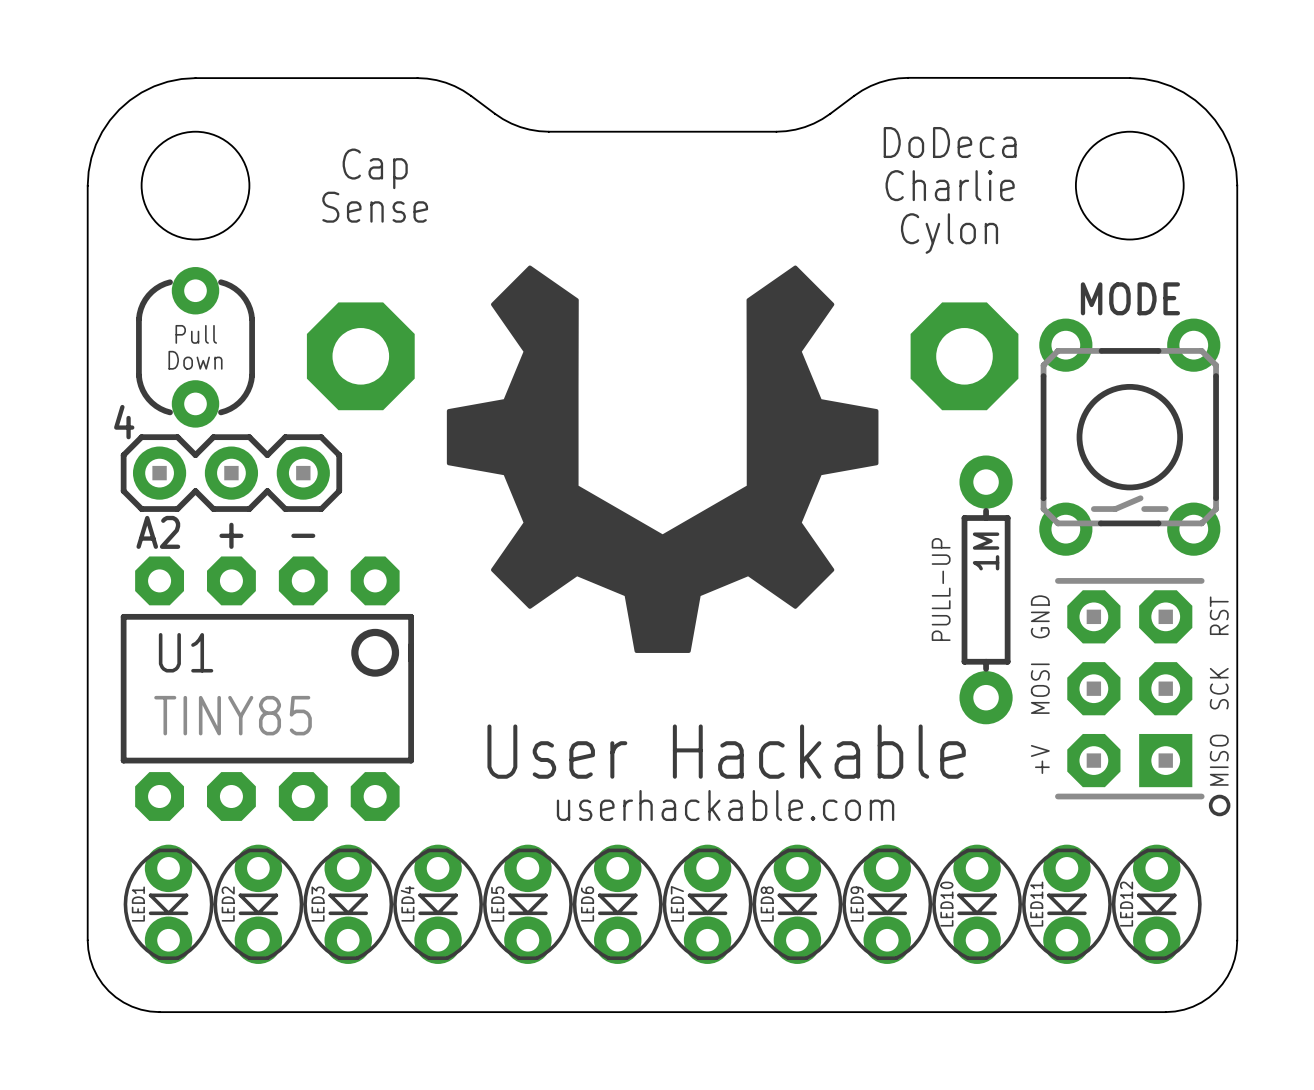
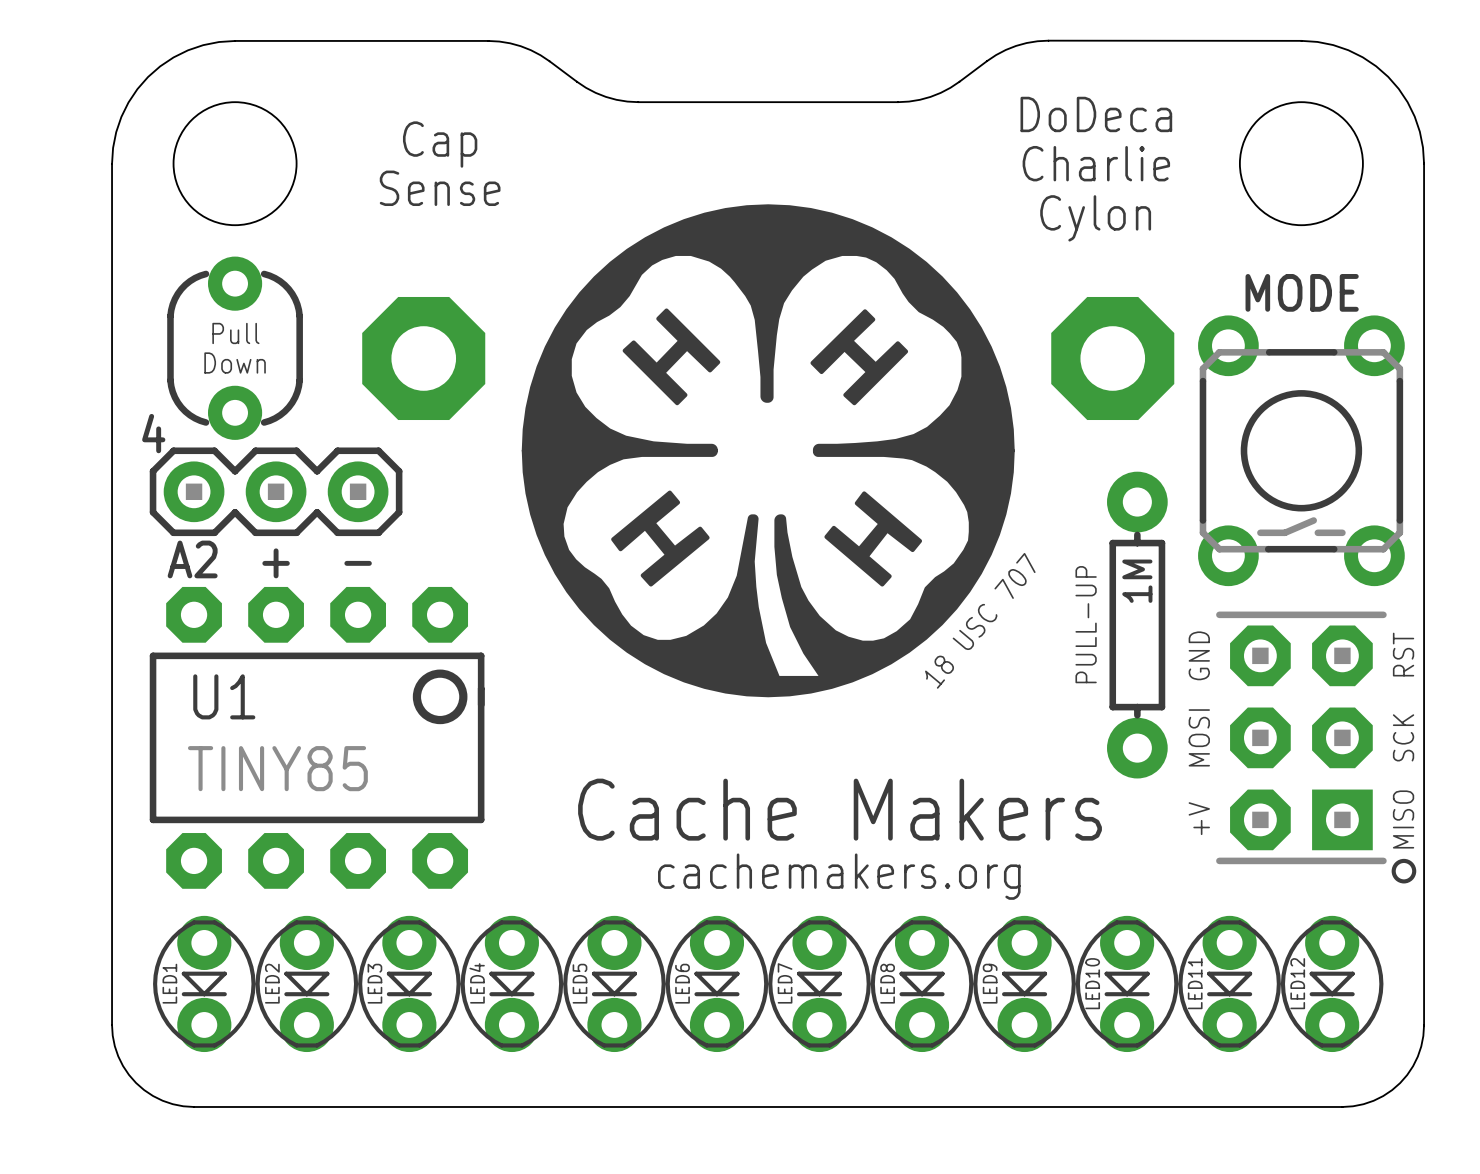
drawing shape: [446, 265, 879, 653] -> [521, 204, 1036, 698]
text: User Hackable (726, 751) -> Cache Makers (840, 809)
text: userhackable.com (725, 805) -> cachemakers.org (839, 876)

